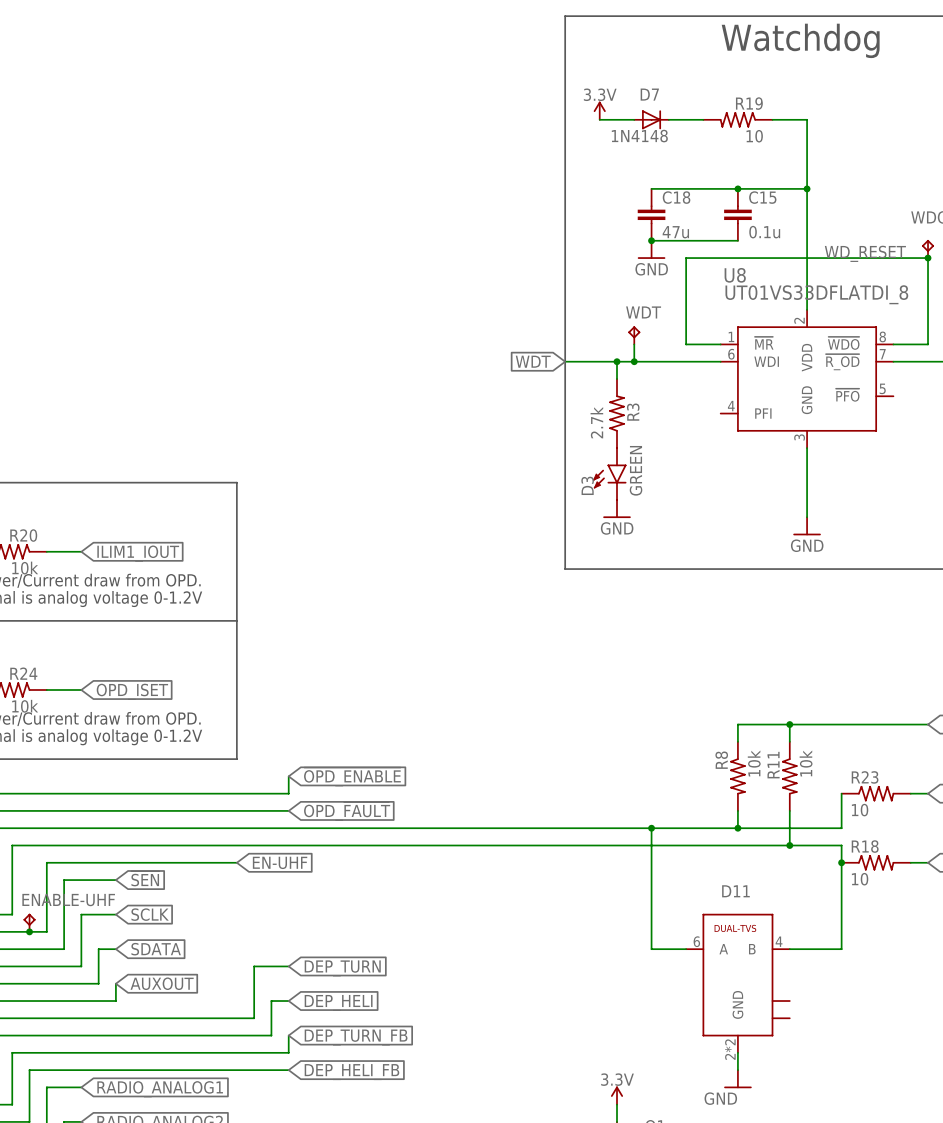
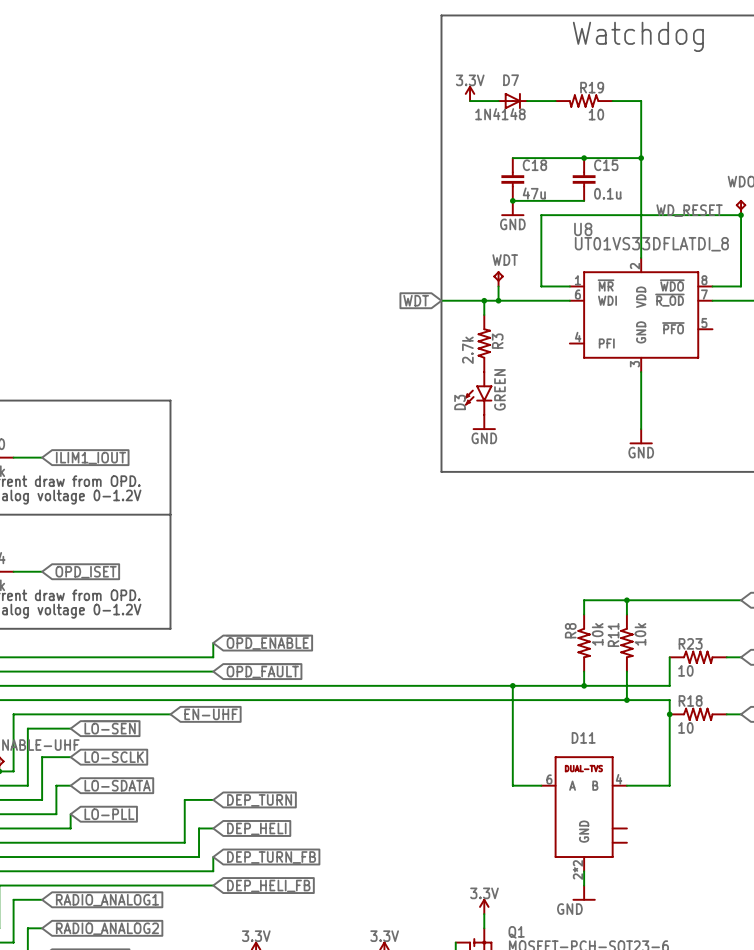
global label: ~{SEN} (145, 878) -> ~{LO-SEN} (110, 727)
global label: SCLK (150, 914) -> LO-SCLK (114, 757)
global label: SDATA (156, 949) -> LO-SDATA (117, 785)
global label: AUXOUT (162, 983) -> LO-PLL (109, 814)

